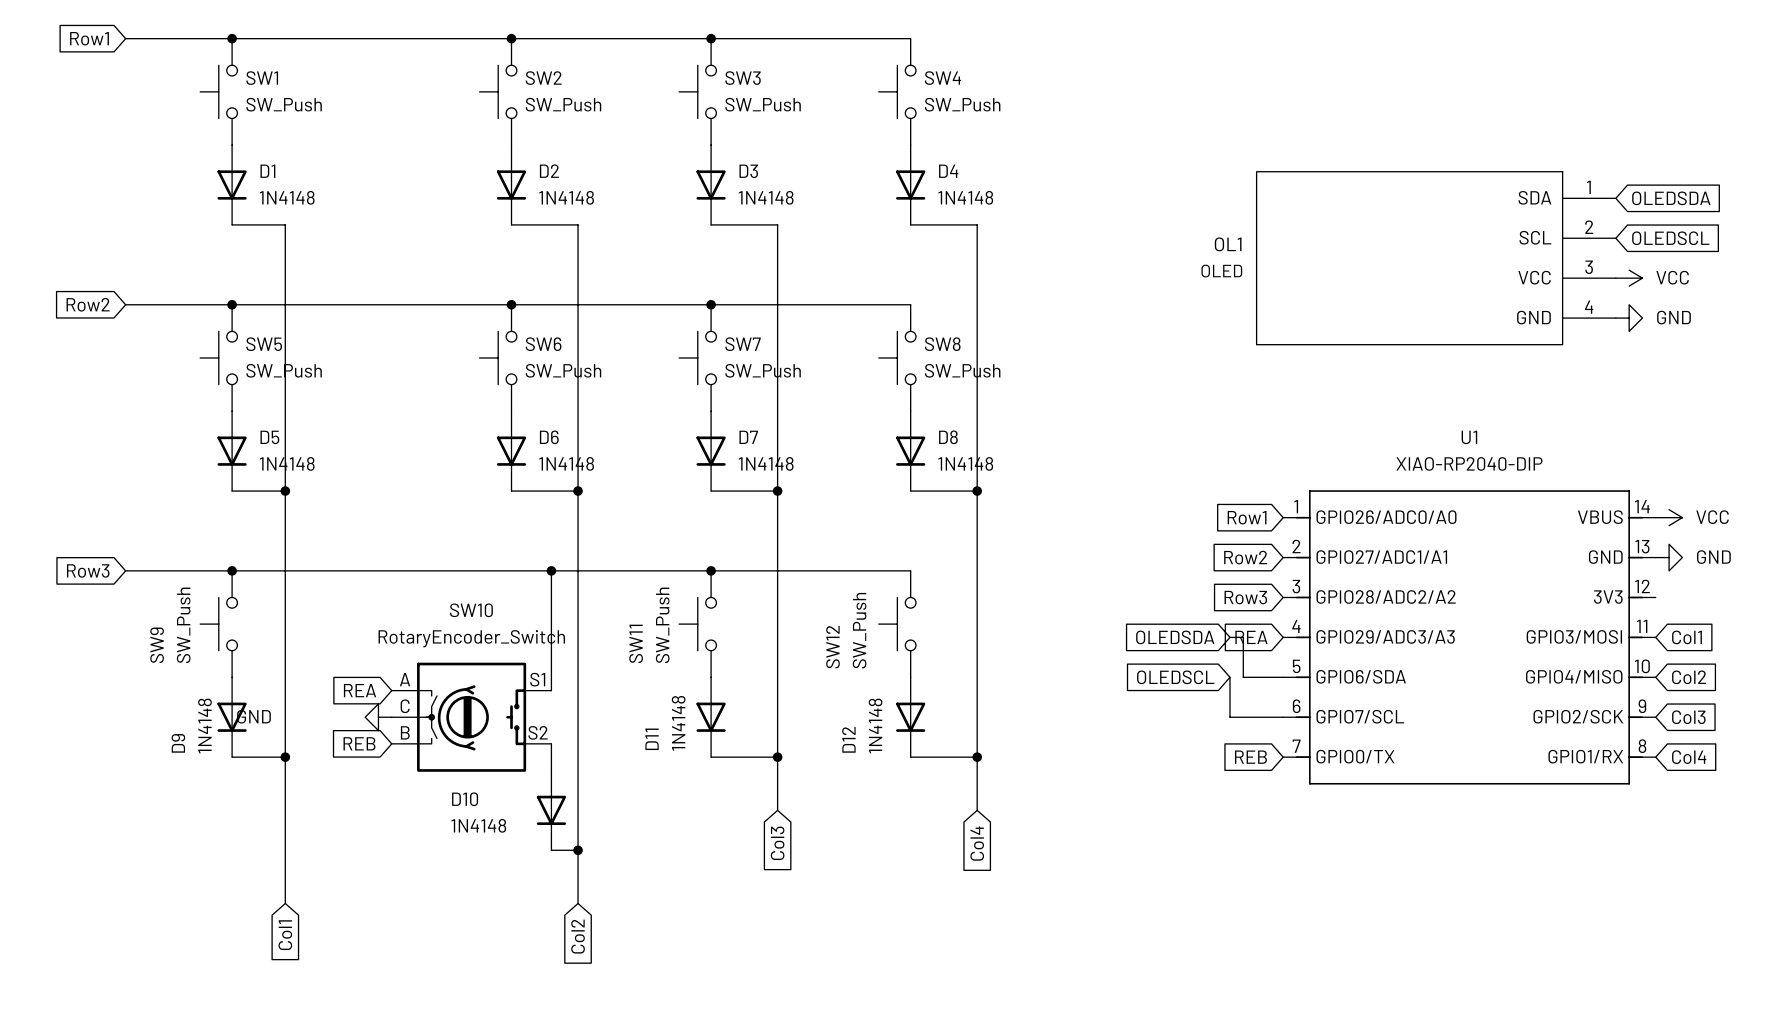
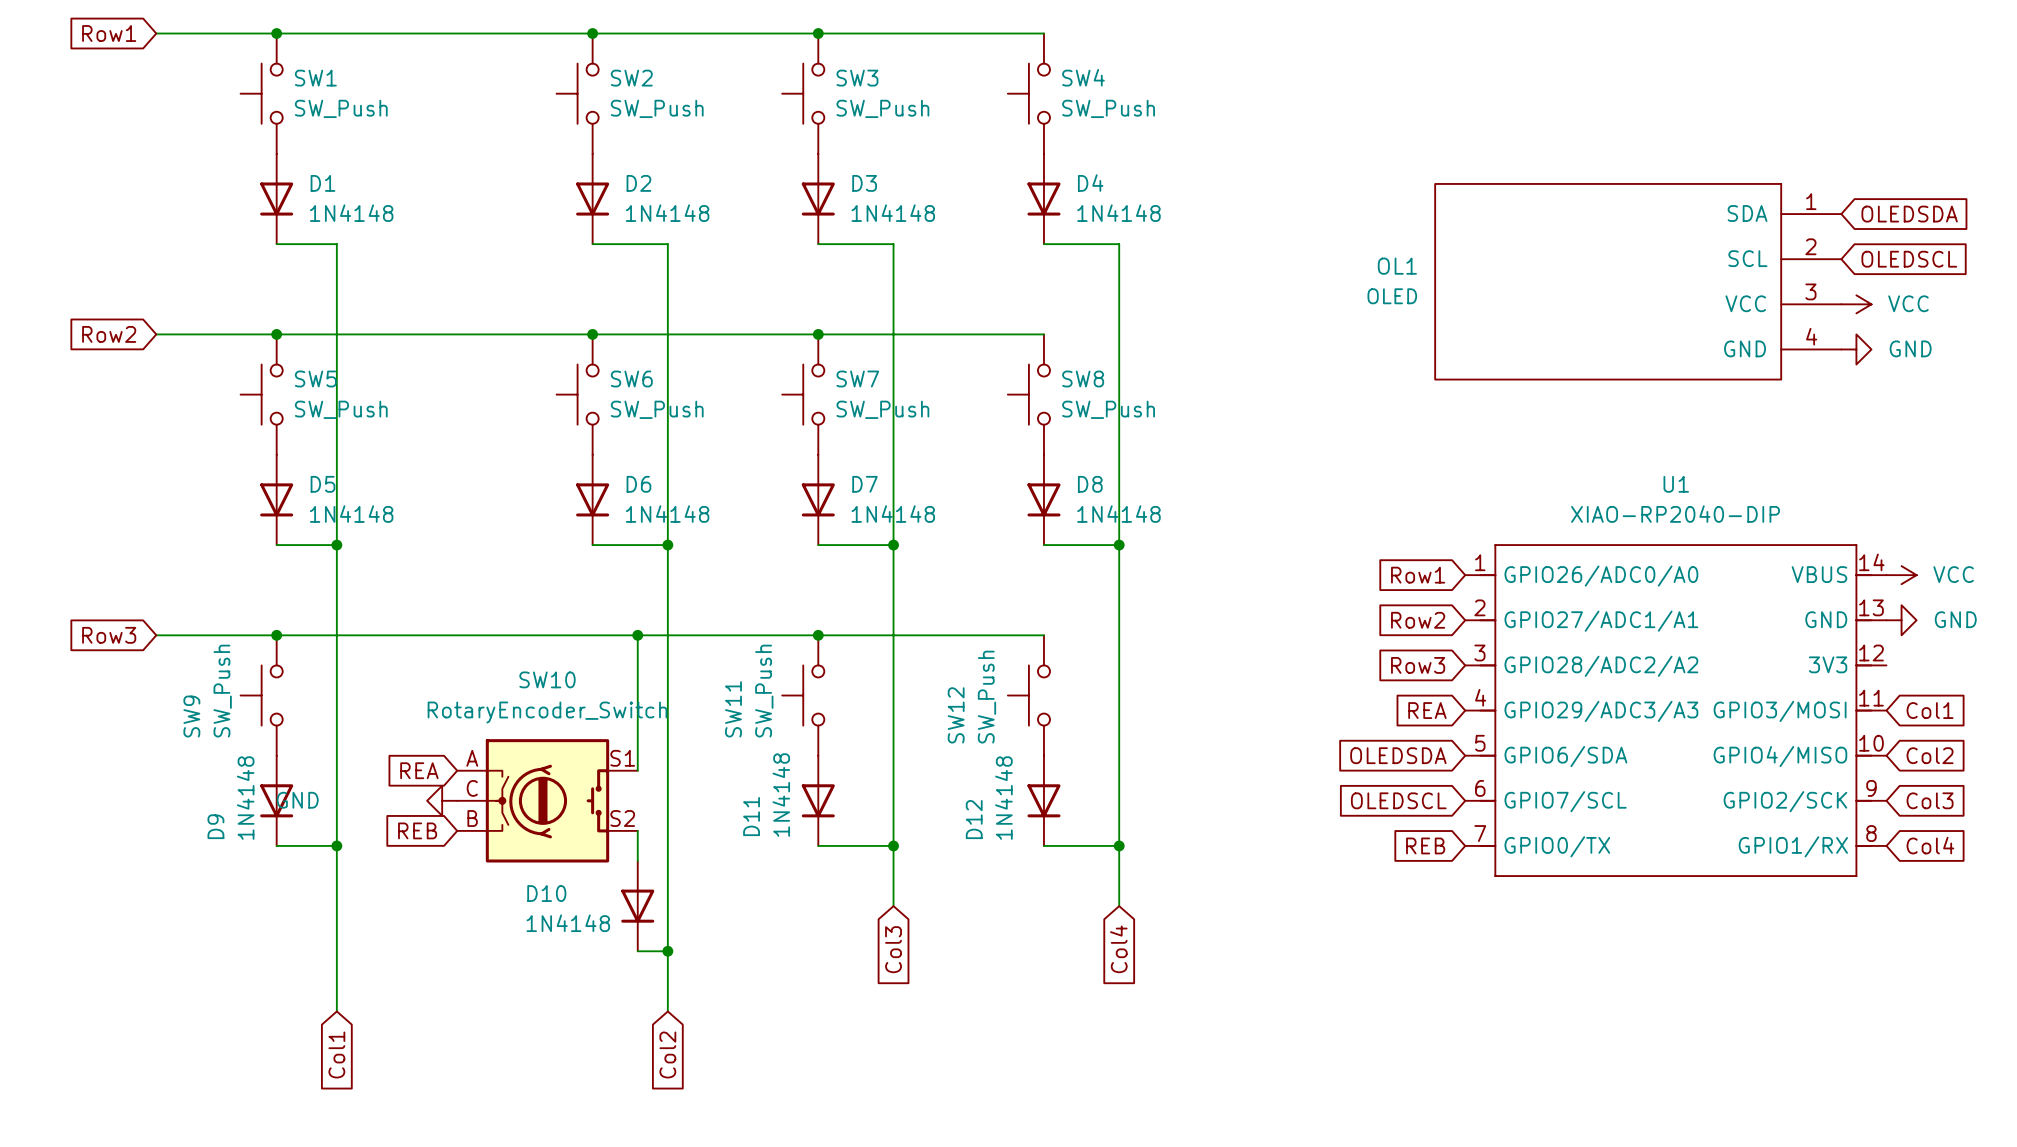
global label position: OLEDSDA (1175, 637) -> OLEDSDA (1398, 755)
wire: (1229, 637) (1243, 637) (1243, 677) (1283, 677) -> none
global label position: OLEDSCL (1175, 677) -> OLEDSCL (1398, 800)
wire: (1229, 677) (1229, 717) (1283, 717) -> none

